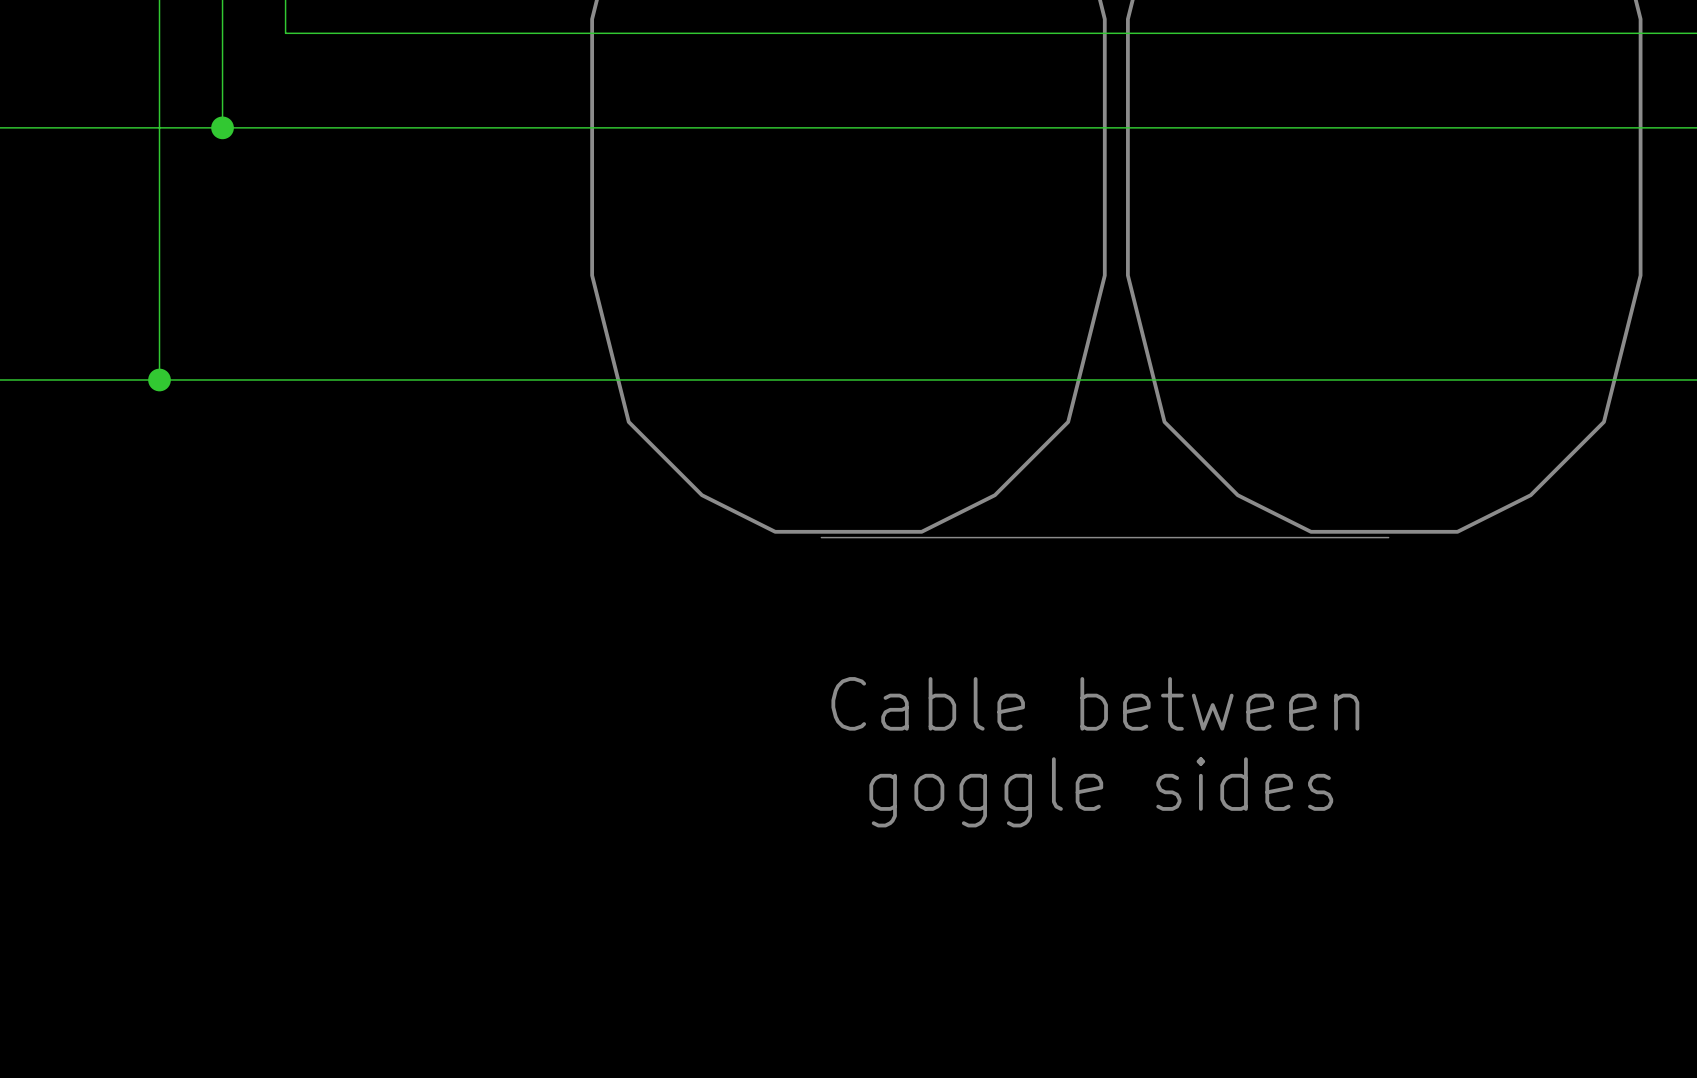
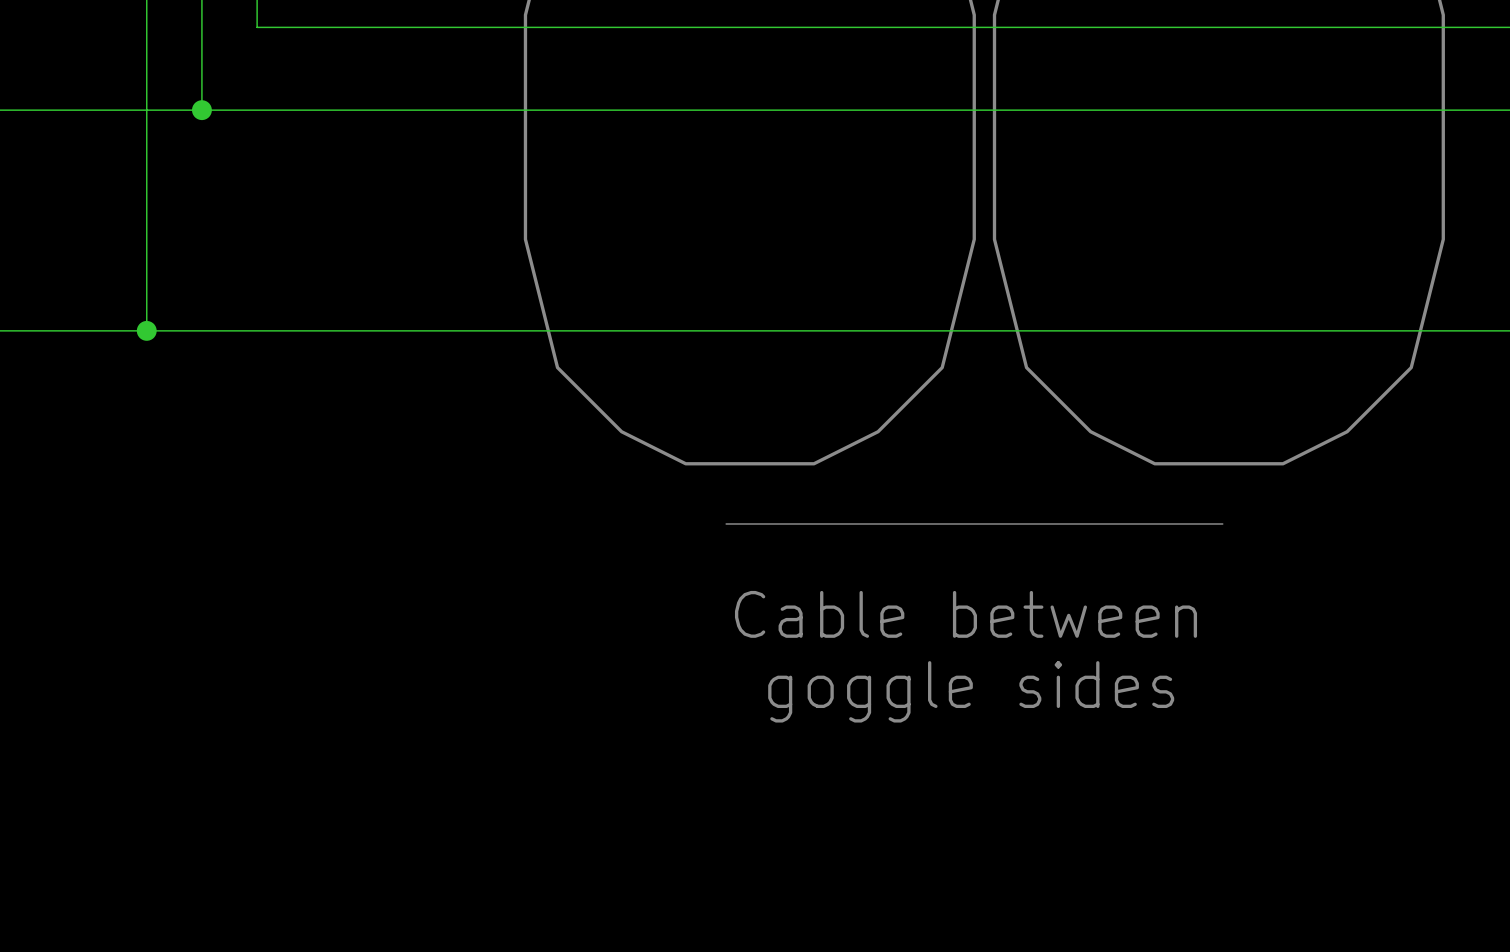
bus: (821, 537) (1388, 537) -> (726, 524) (1222, 524)

